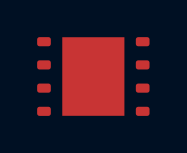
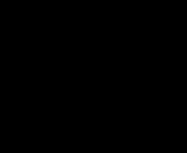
part: (93, 76) -> none

